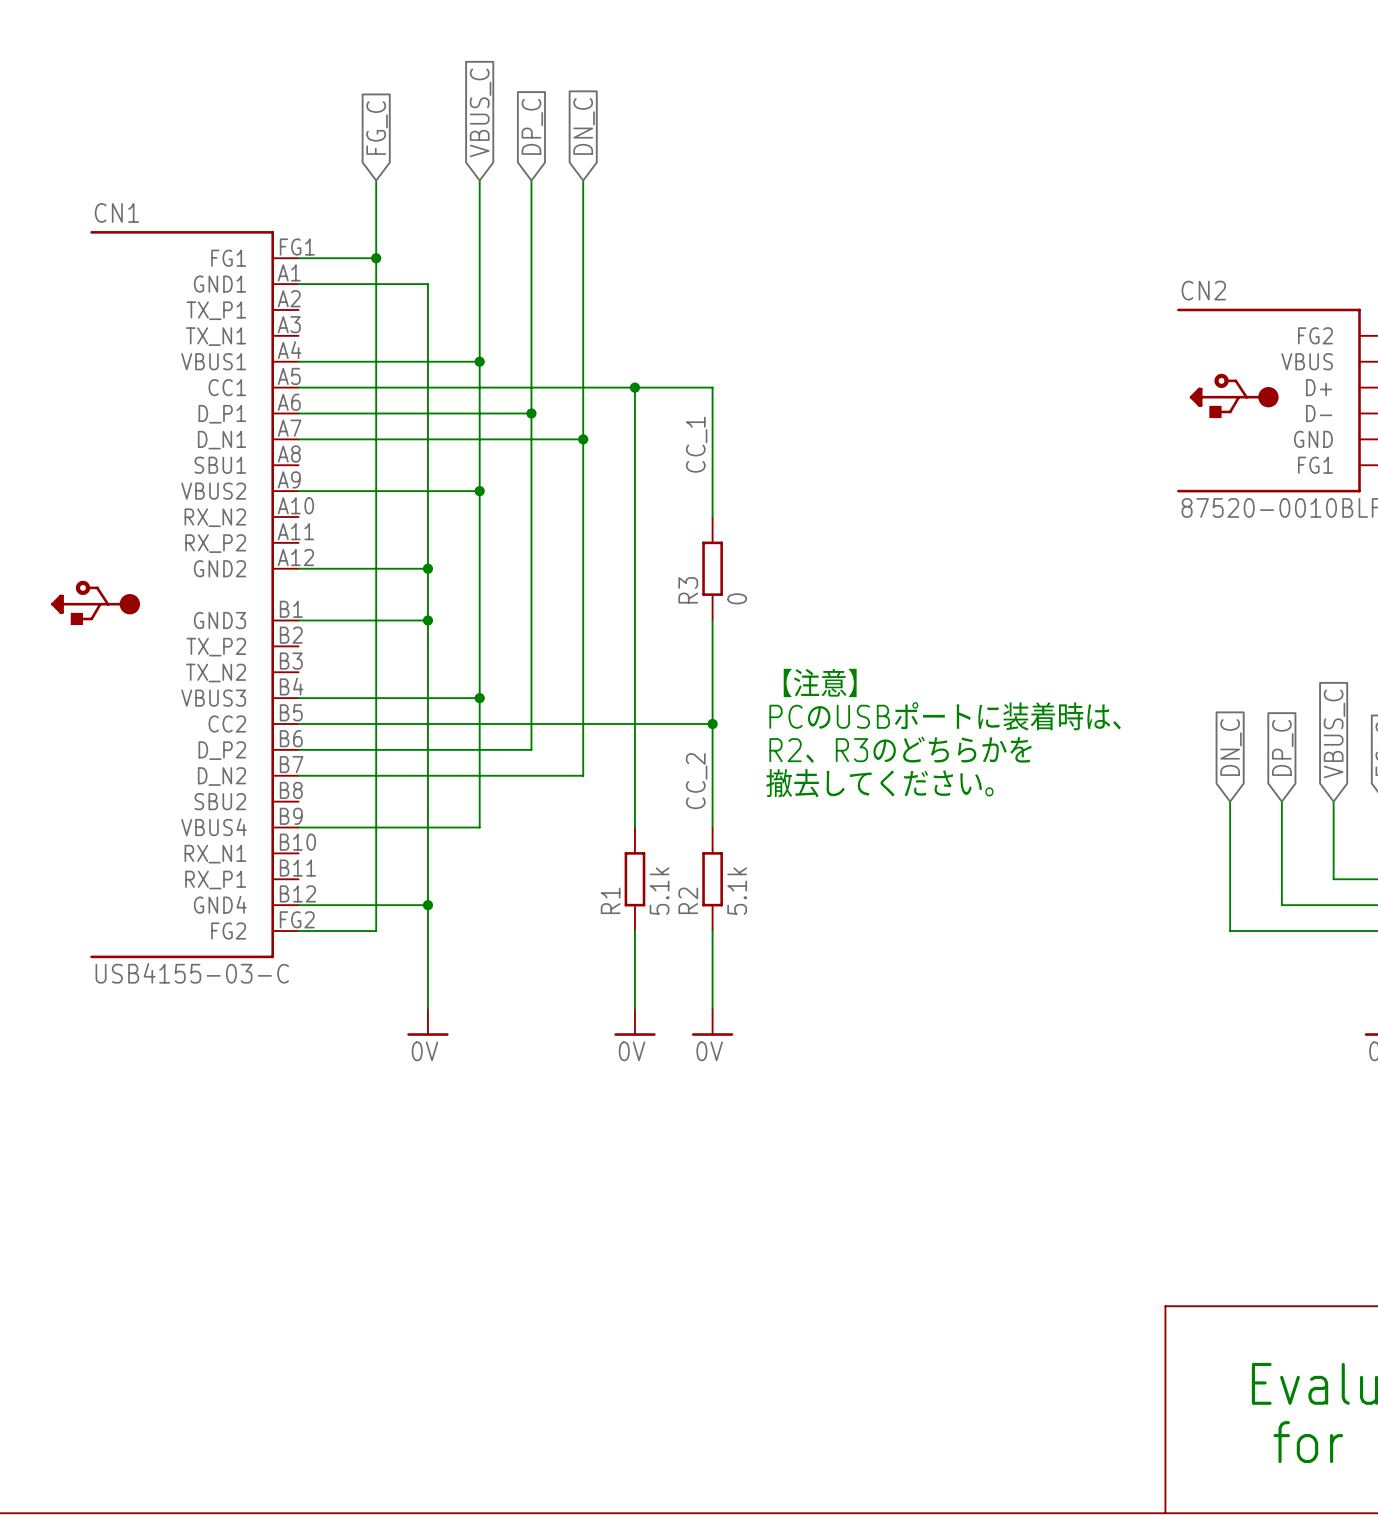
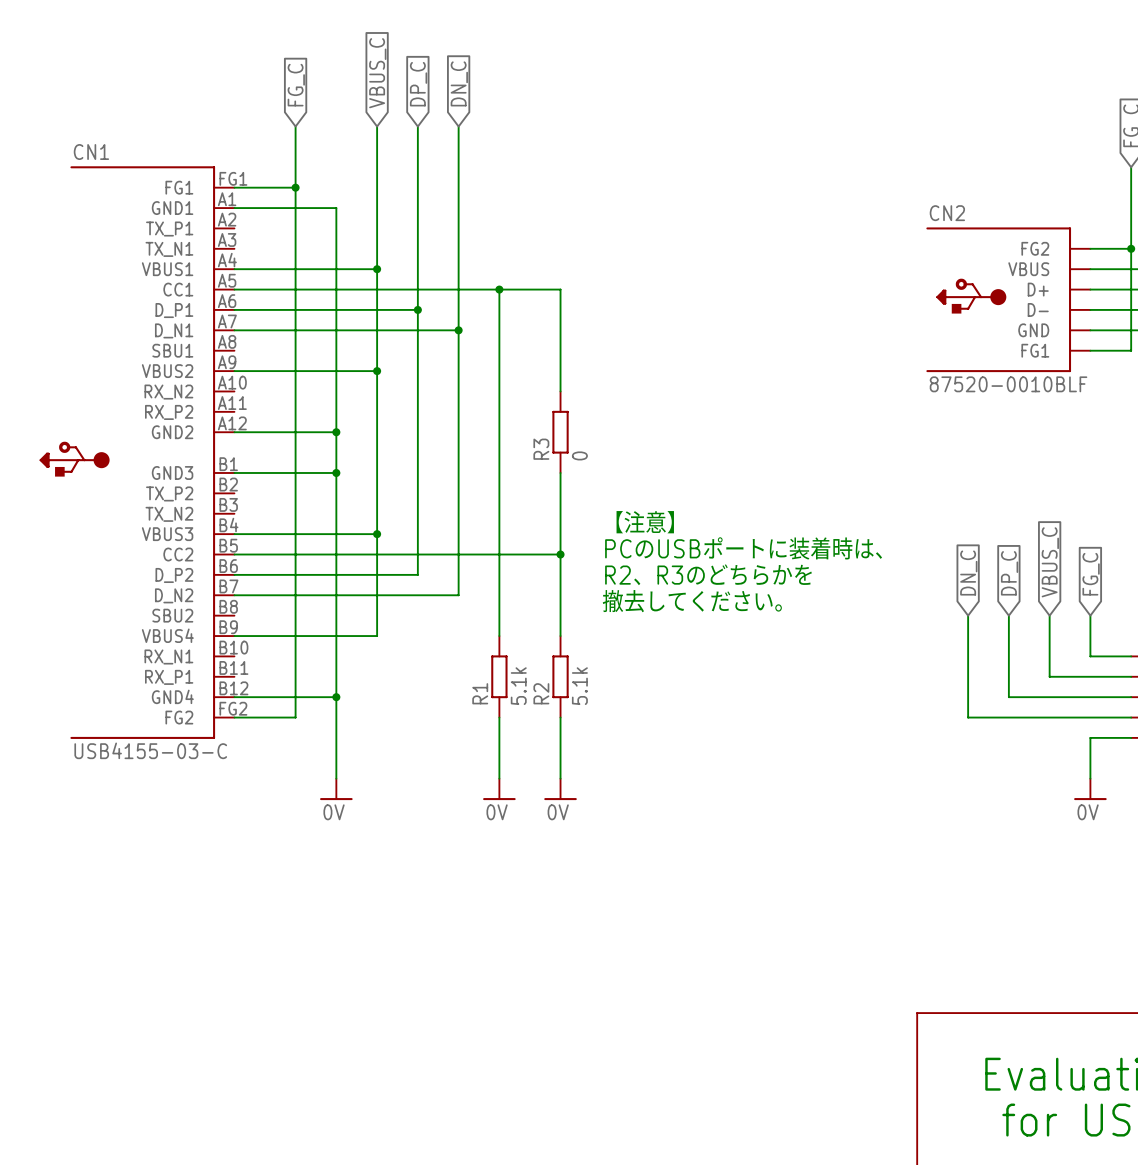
label: CC_1 (696, 444) -> none
label: CC_2 (696, 781) -> none

